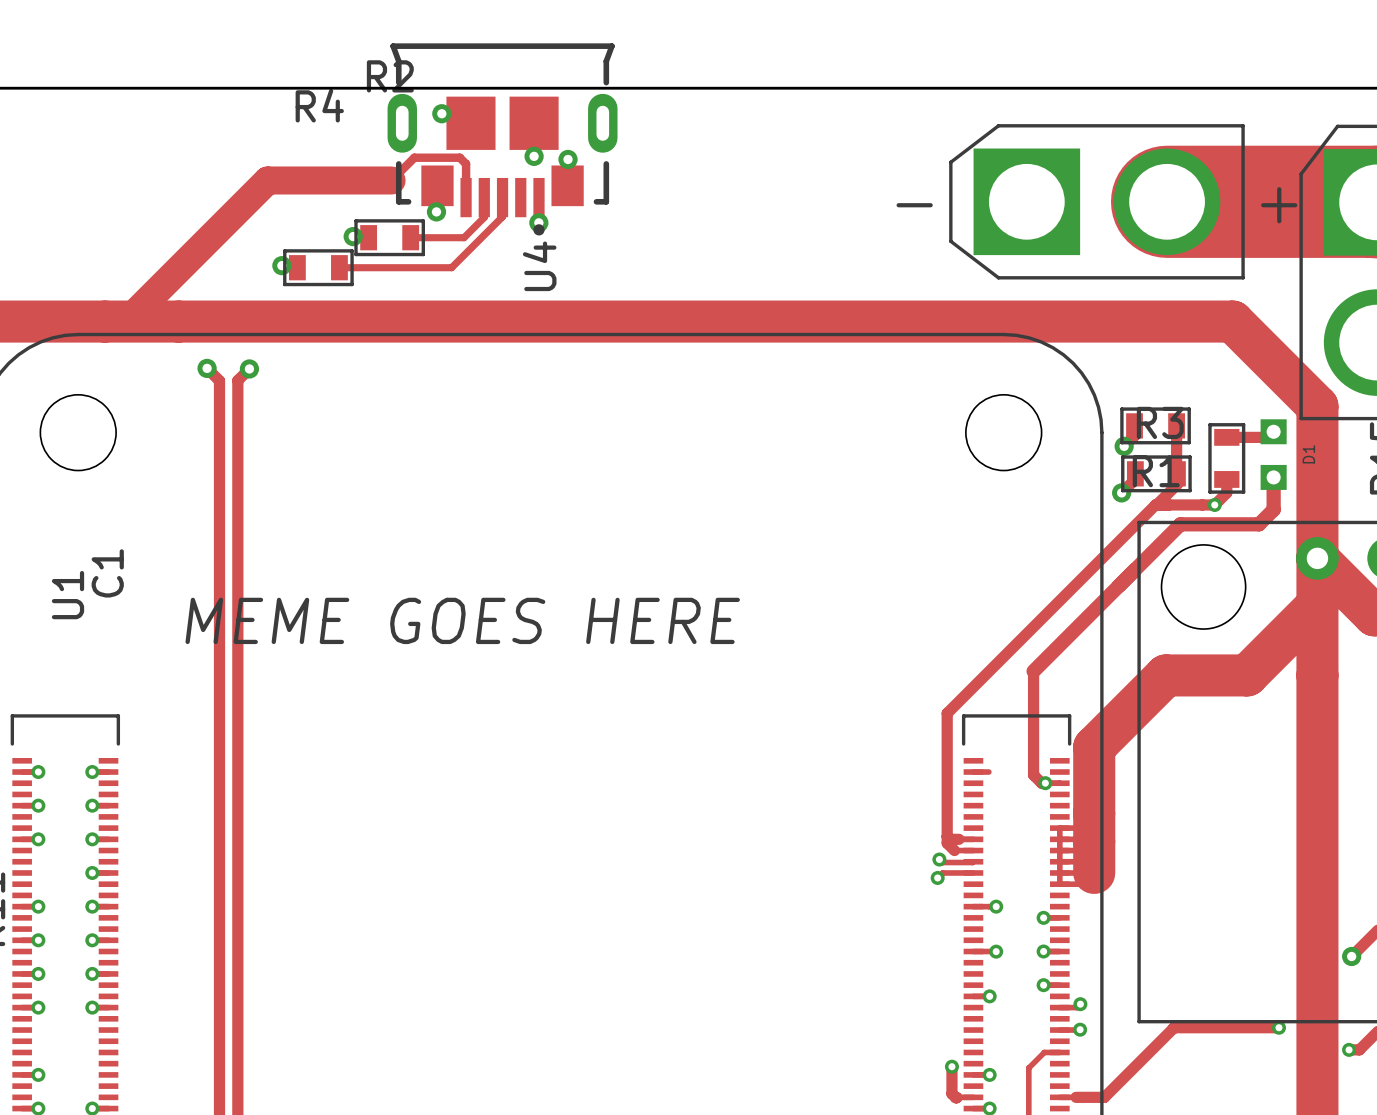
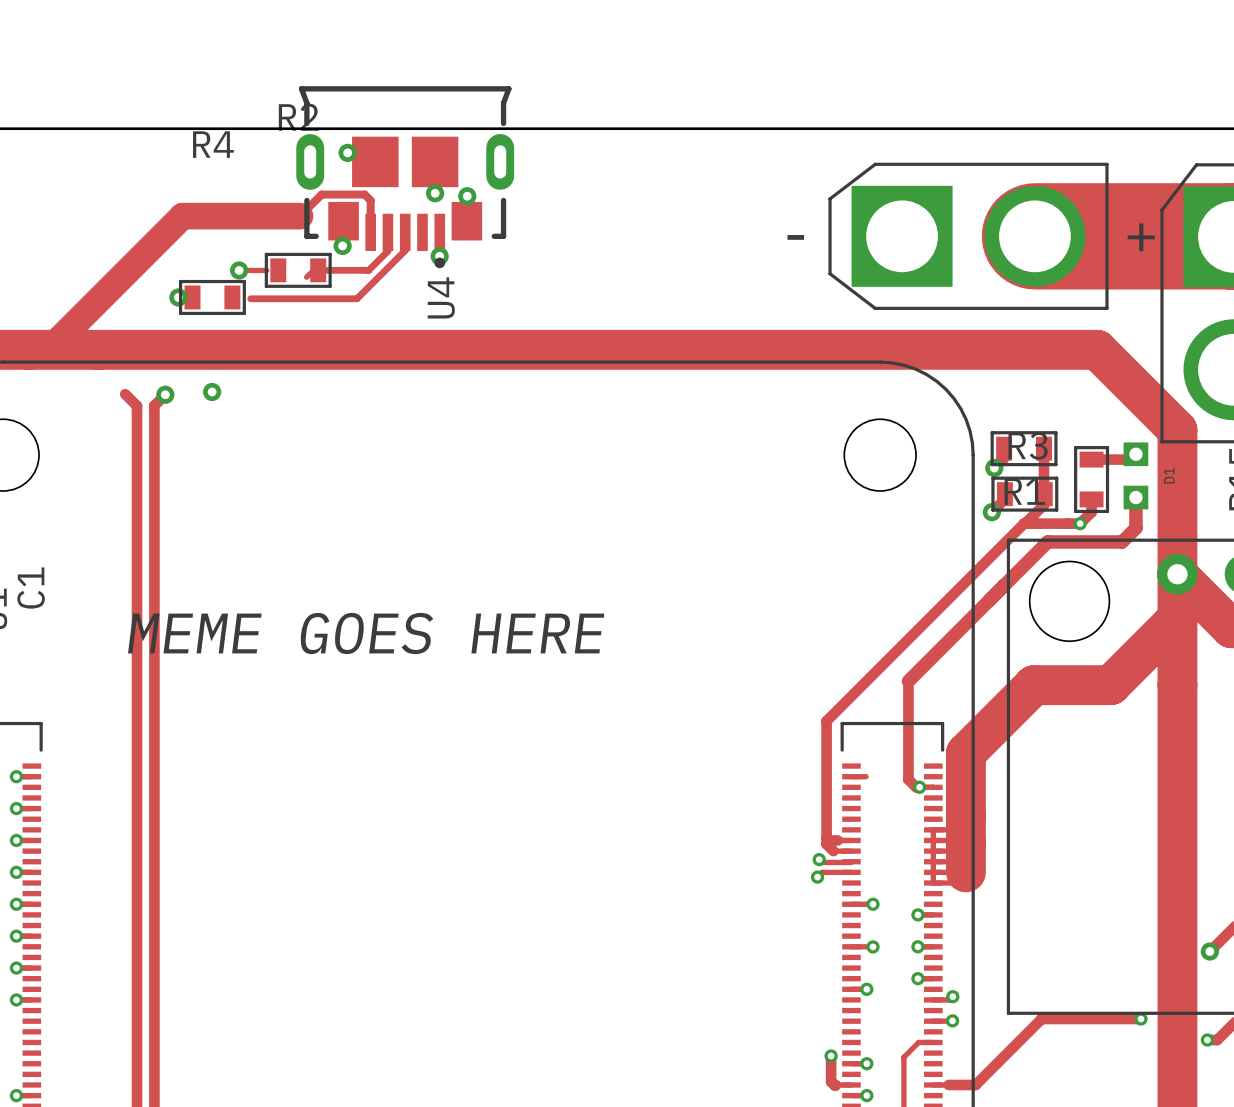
via position: (353, 236) -> (239, 270)
track: none -> (232, 270) (266, 270)
track: none -> (313, 270) (306, 277)
via position: (281, 265) -> (178, 297)
R4 position: (318, 267) -> (212, 297)
via: none -> (212, 391)
via: (207, 368) -> none

